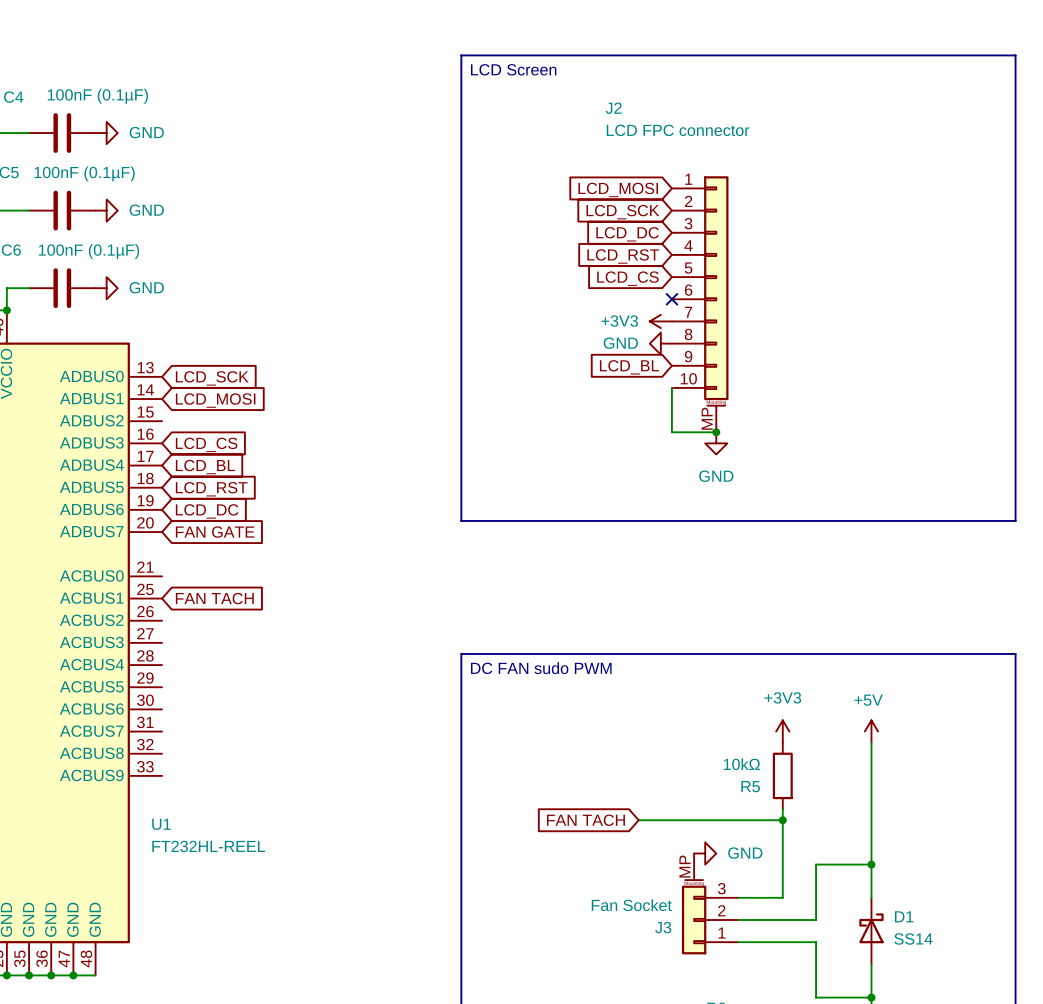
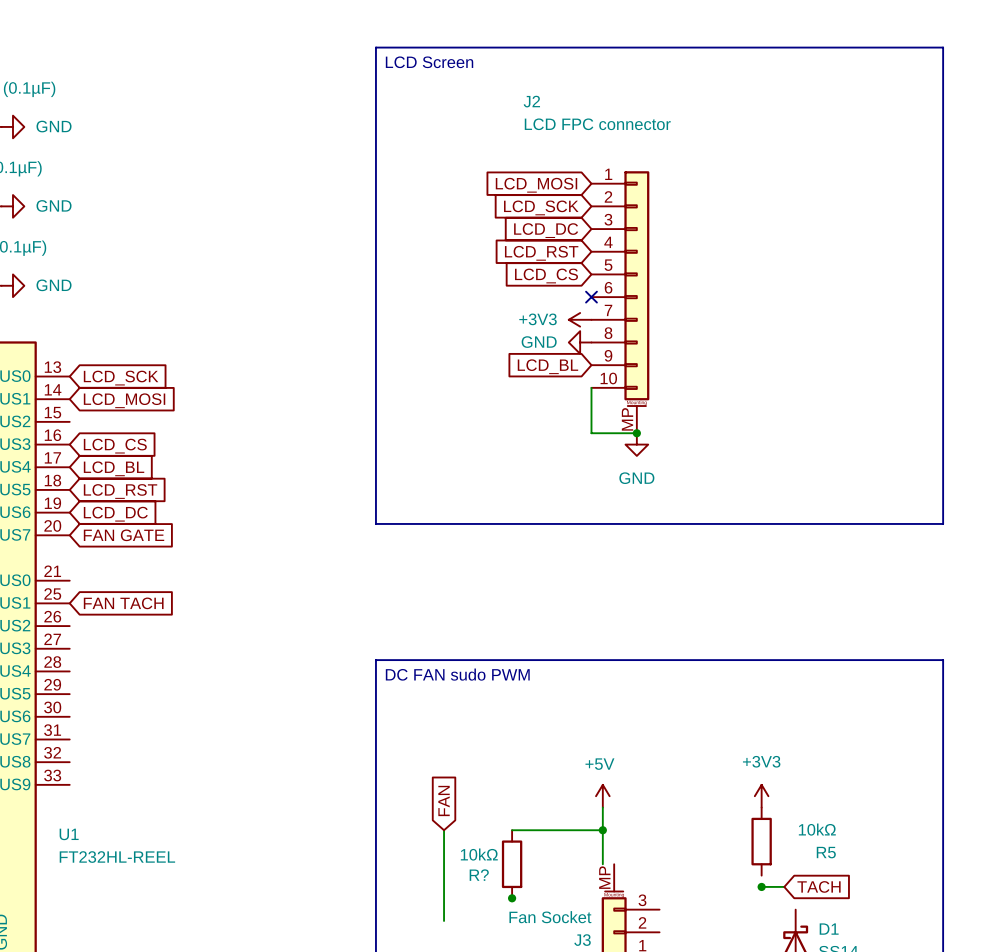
power symbol position: +3V3 (782, 731) -> +3V3 (761, 796)
power symbol position: +5V (871, 731) -> +5V (602, 796)
wire: (871, 742) (871, 897) -> none
R5 value position: 10kΩ (741, 764) -> 10kΩ (817, 829)
R5 position: (782, 775) -> (761, 841)
R5 name position: R5 (750, 786) -> R5 (826, 852)
global label: none -> FAN (444, 800)
wire: none -> (602, 807) (602, 864)
wire: (782, 809) (782, 897) (738, 897) -> none
wire: none -> (444, 830) (444, 920)
global label: FAN TACH (585, 820) -> none
wire: none -> (512, 830) (557, 830)
wire: (683, 820) (782, 820) -> none
junction: none -> (602, 830)
junction: (782, 820) -> none
R?: none -> 10kΩ (512, 864)
power symbol: GND (705, 853) -> none
wire: (871, 864) (816, 864) (816, 920) (738, 920) -> none
junction position: (871, 864) -> (761, 886)
wire: none -> (761, 886) (784, 886)
global label: none -> TACH (819, 886)
junction: none -> (512, 898)

